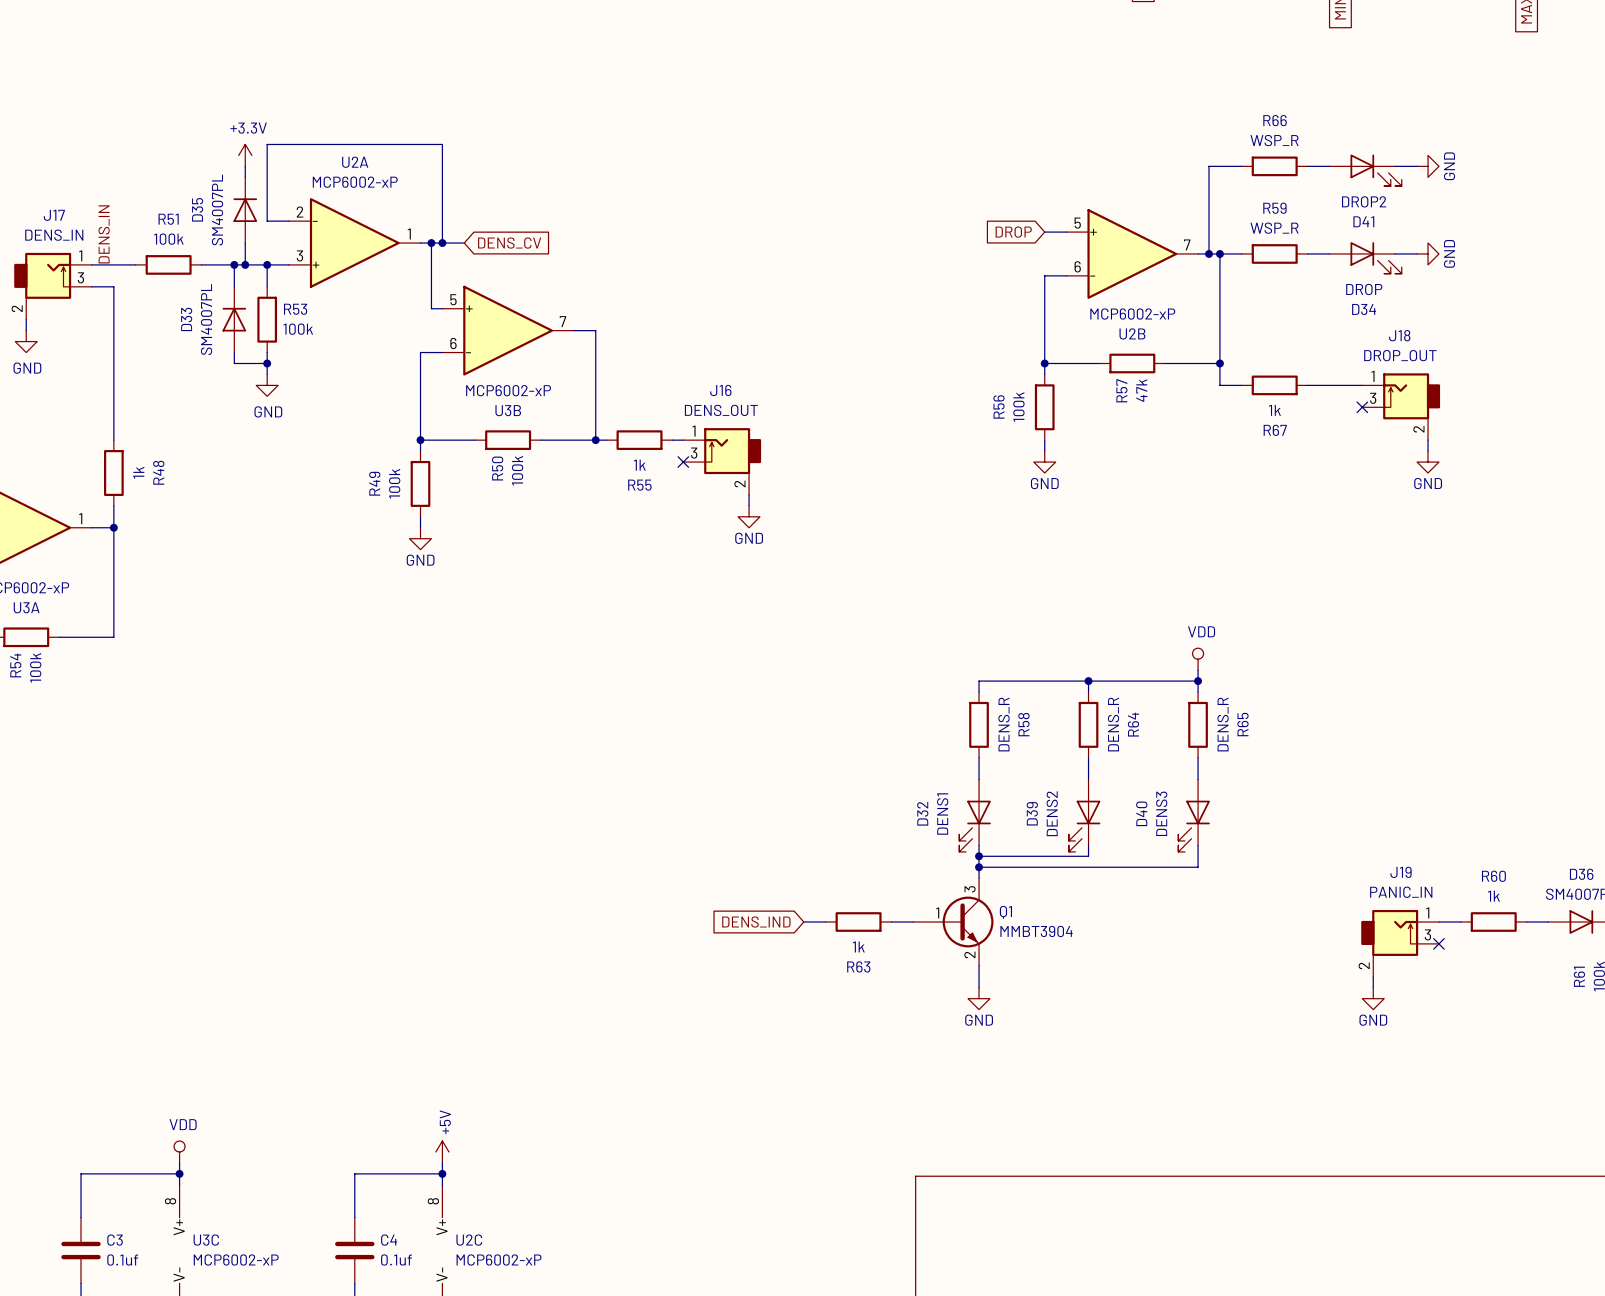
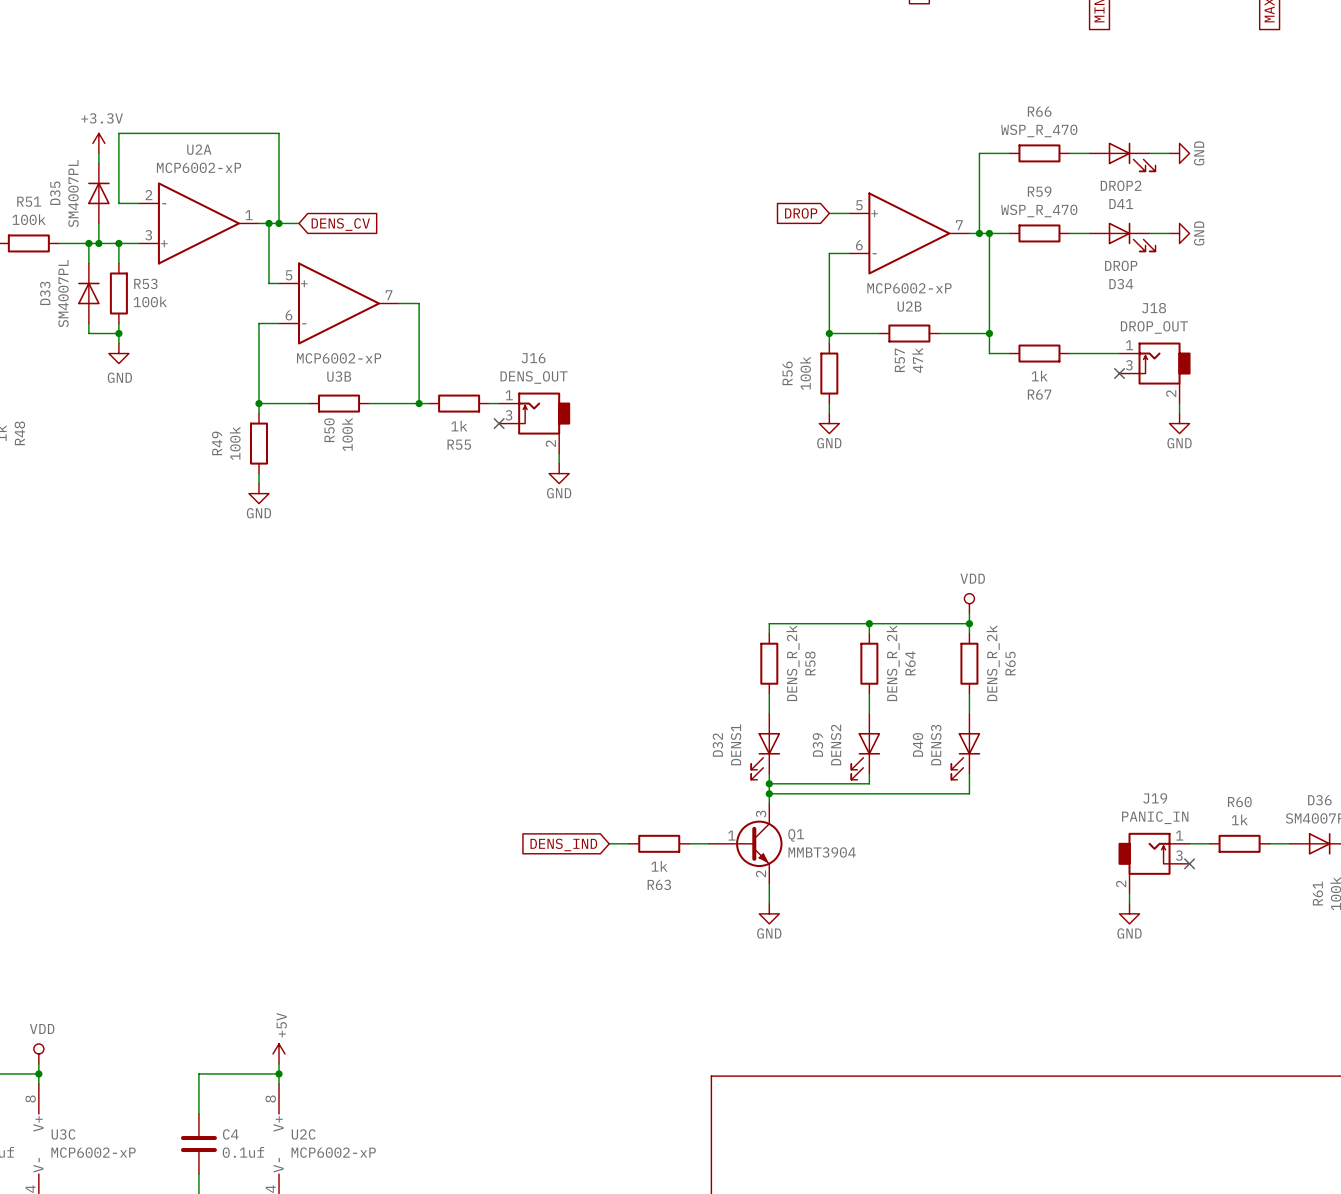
R66 value: WSP_R (1274, 140) -> WSP_R_470 (1039, 130)
R59 value: WSP_R (1274, 228) -> WSP_R_470 (1039, 210)
R58 value: DENS_R (1004, 724) -> DENS_R_2k (793, 663)
R64 value: DENS_R (1113, 724) -> DENS_R_2k (893, 663)
R65 value: DENS_R (1223, 724) -> DENS_R_2k (993, 663)

